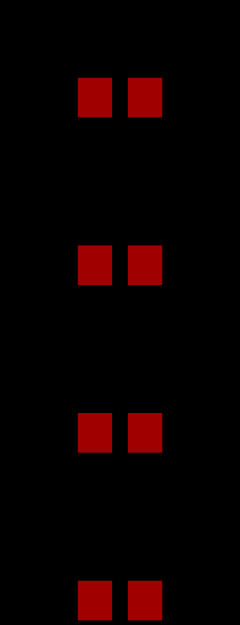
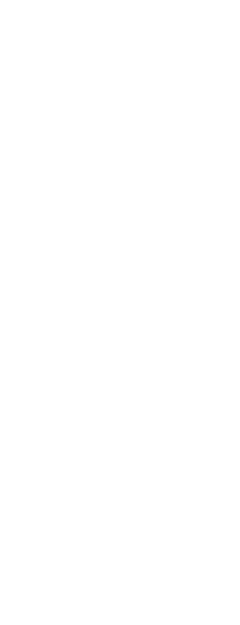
part: (120, 97) -> none
part: (120, 265) -> none
part: (120, 432) -> none
part: (120, 600) -> none

